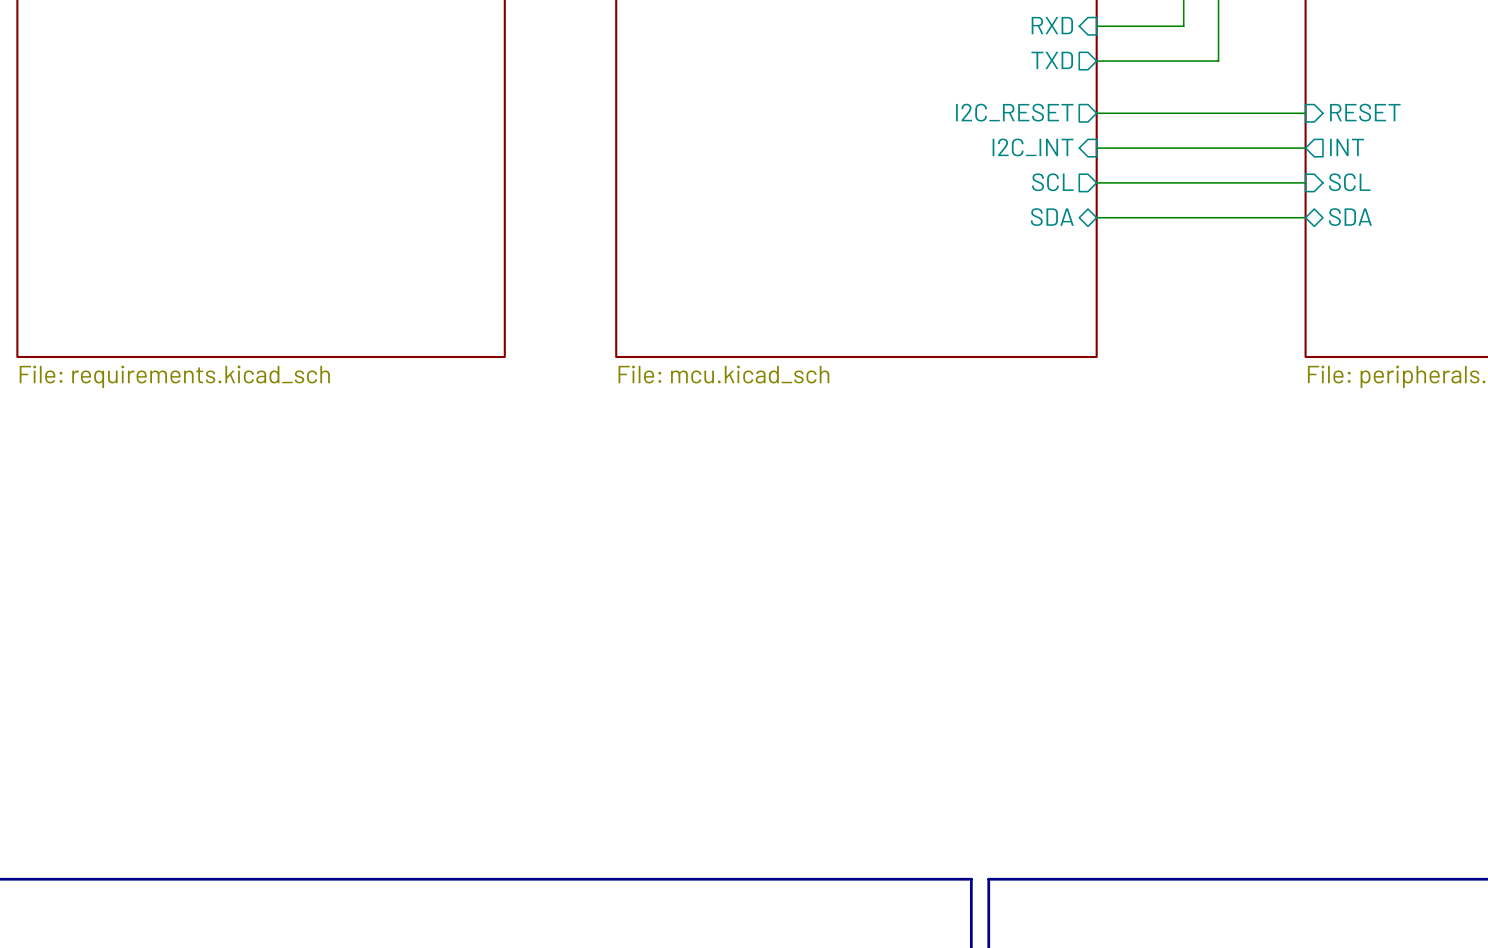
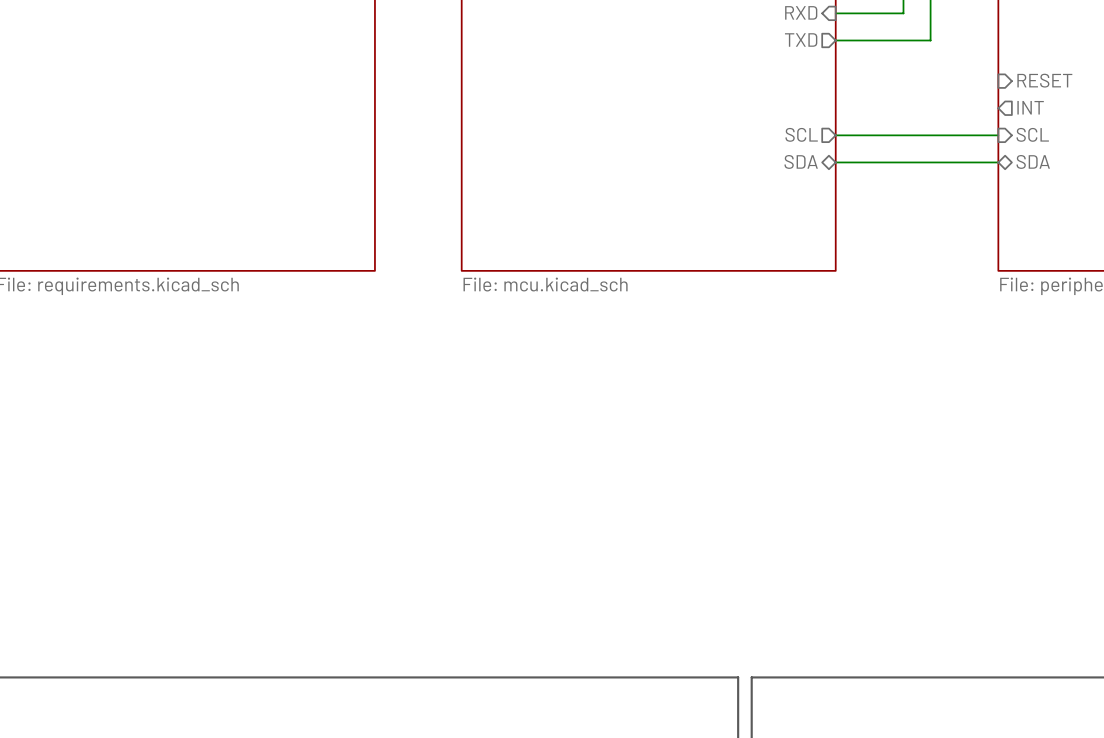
sheet pin: I2C_RESET (1014, 112) -> none
wire: (1096, 113) (1305, 113) -> none
sheet pin: I2C_INT (1033, 147) -> none
wire: (1096, 148) (1305, 148) -> none

